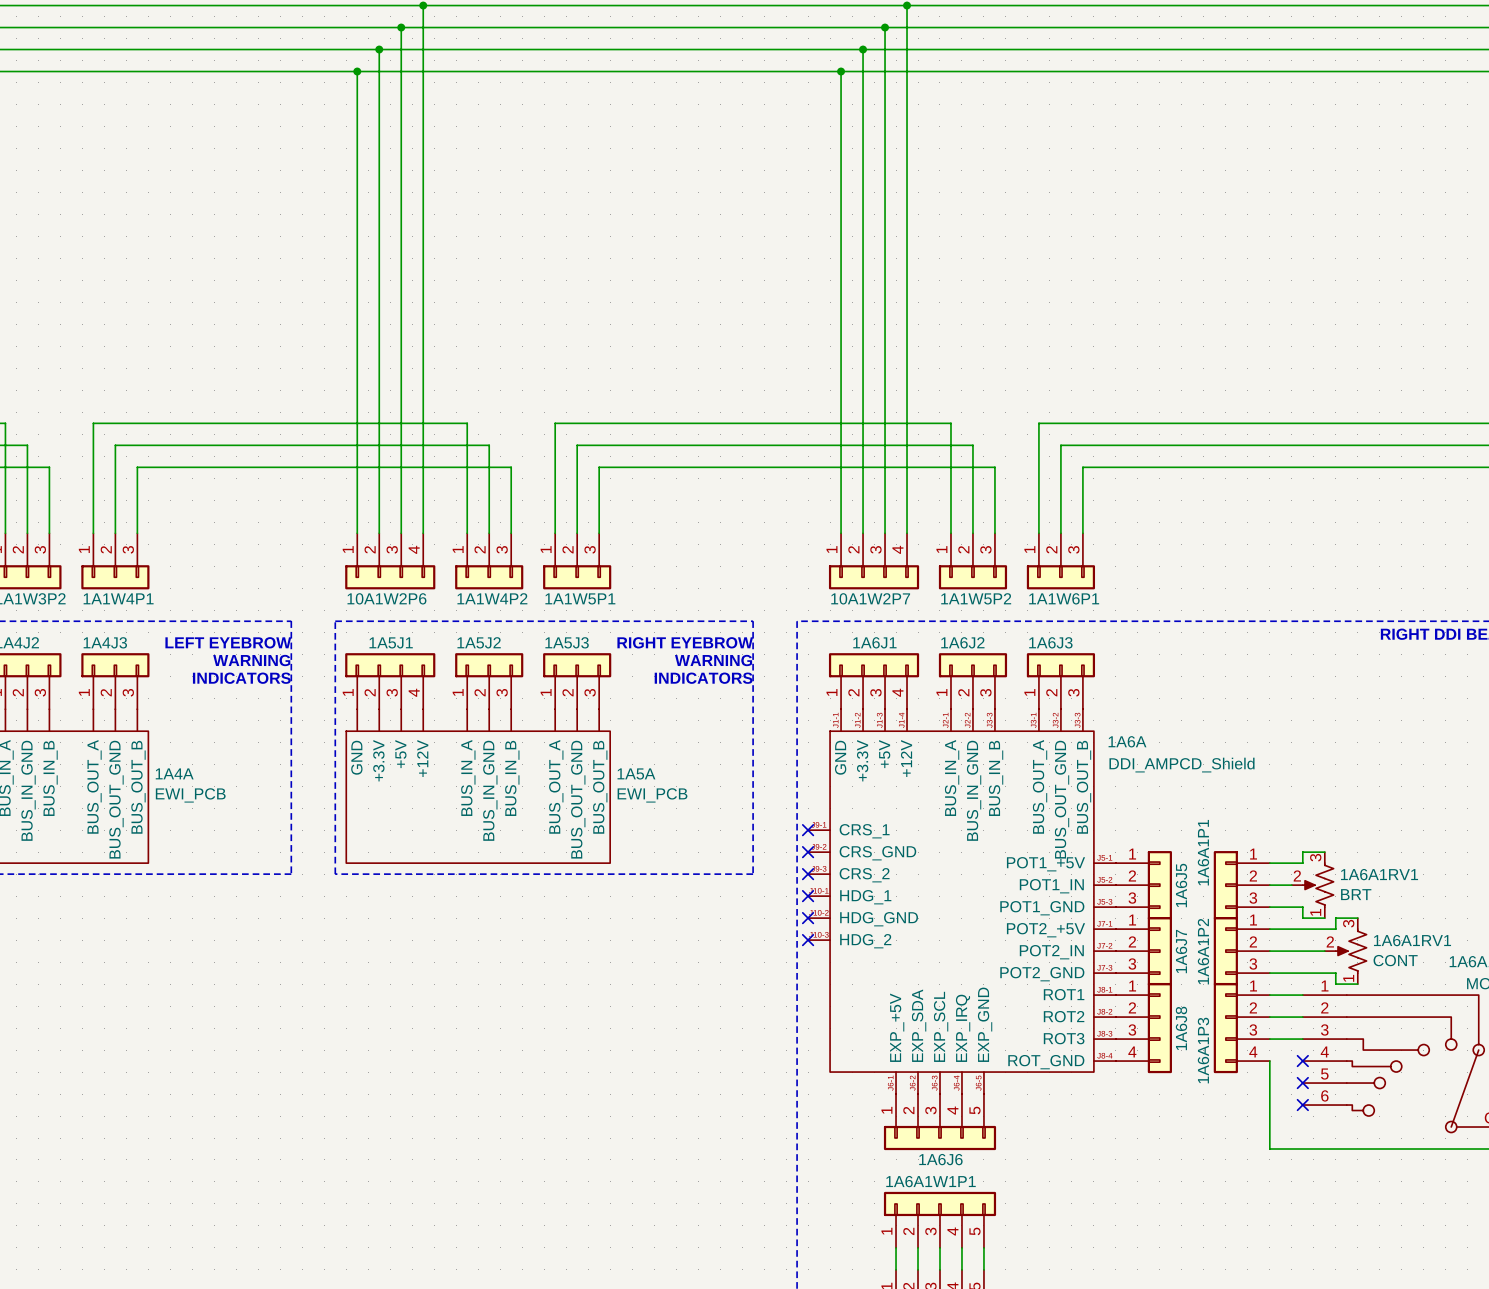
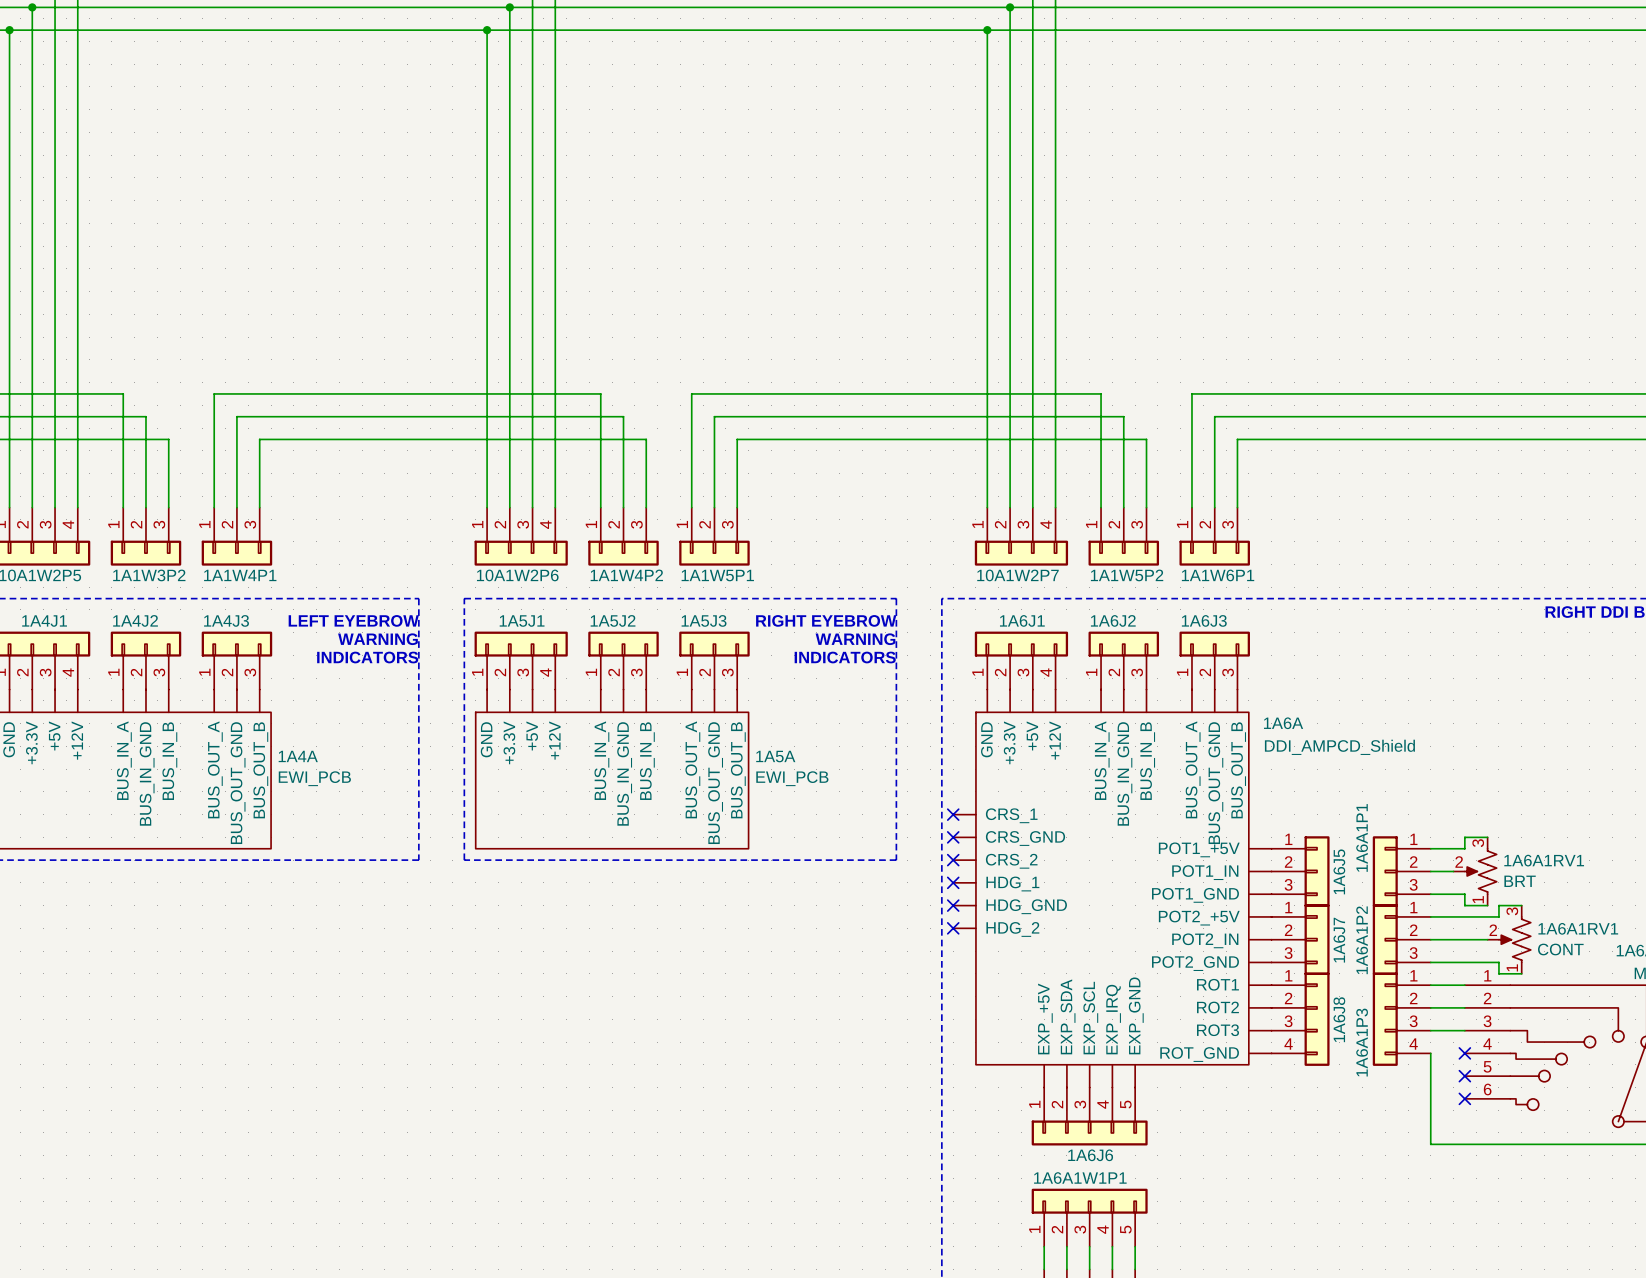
1A6A symbol: [808, 709, 1116, 1095] -> [953, 689, 1272, 1088]

